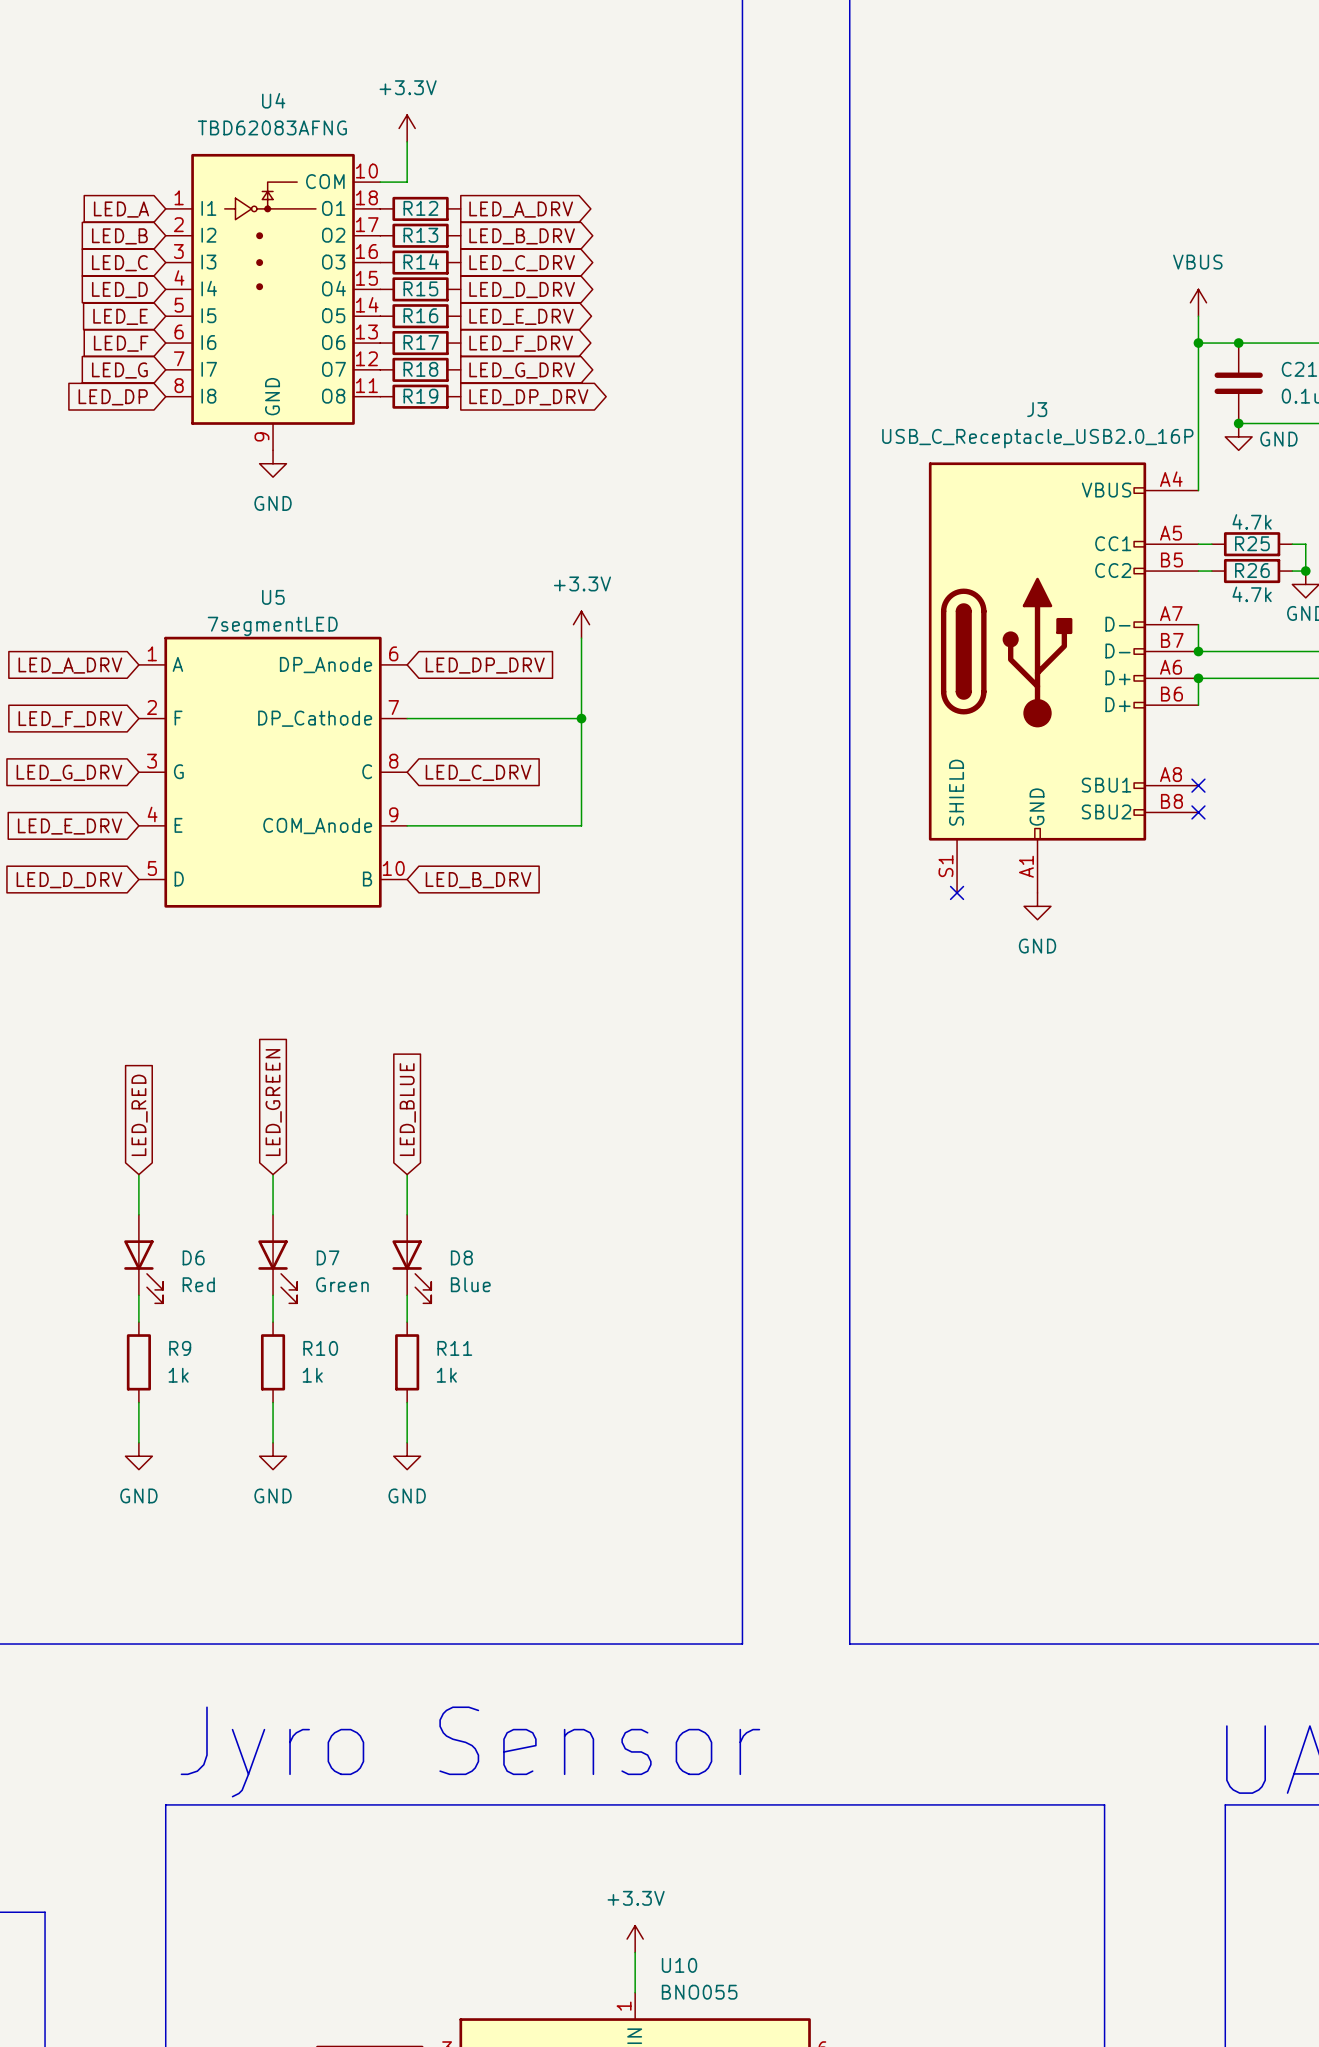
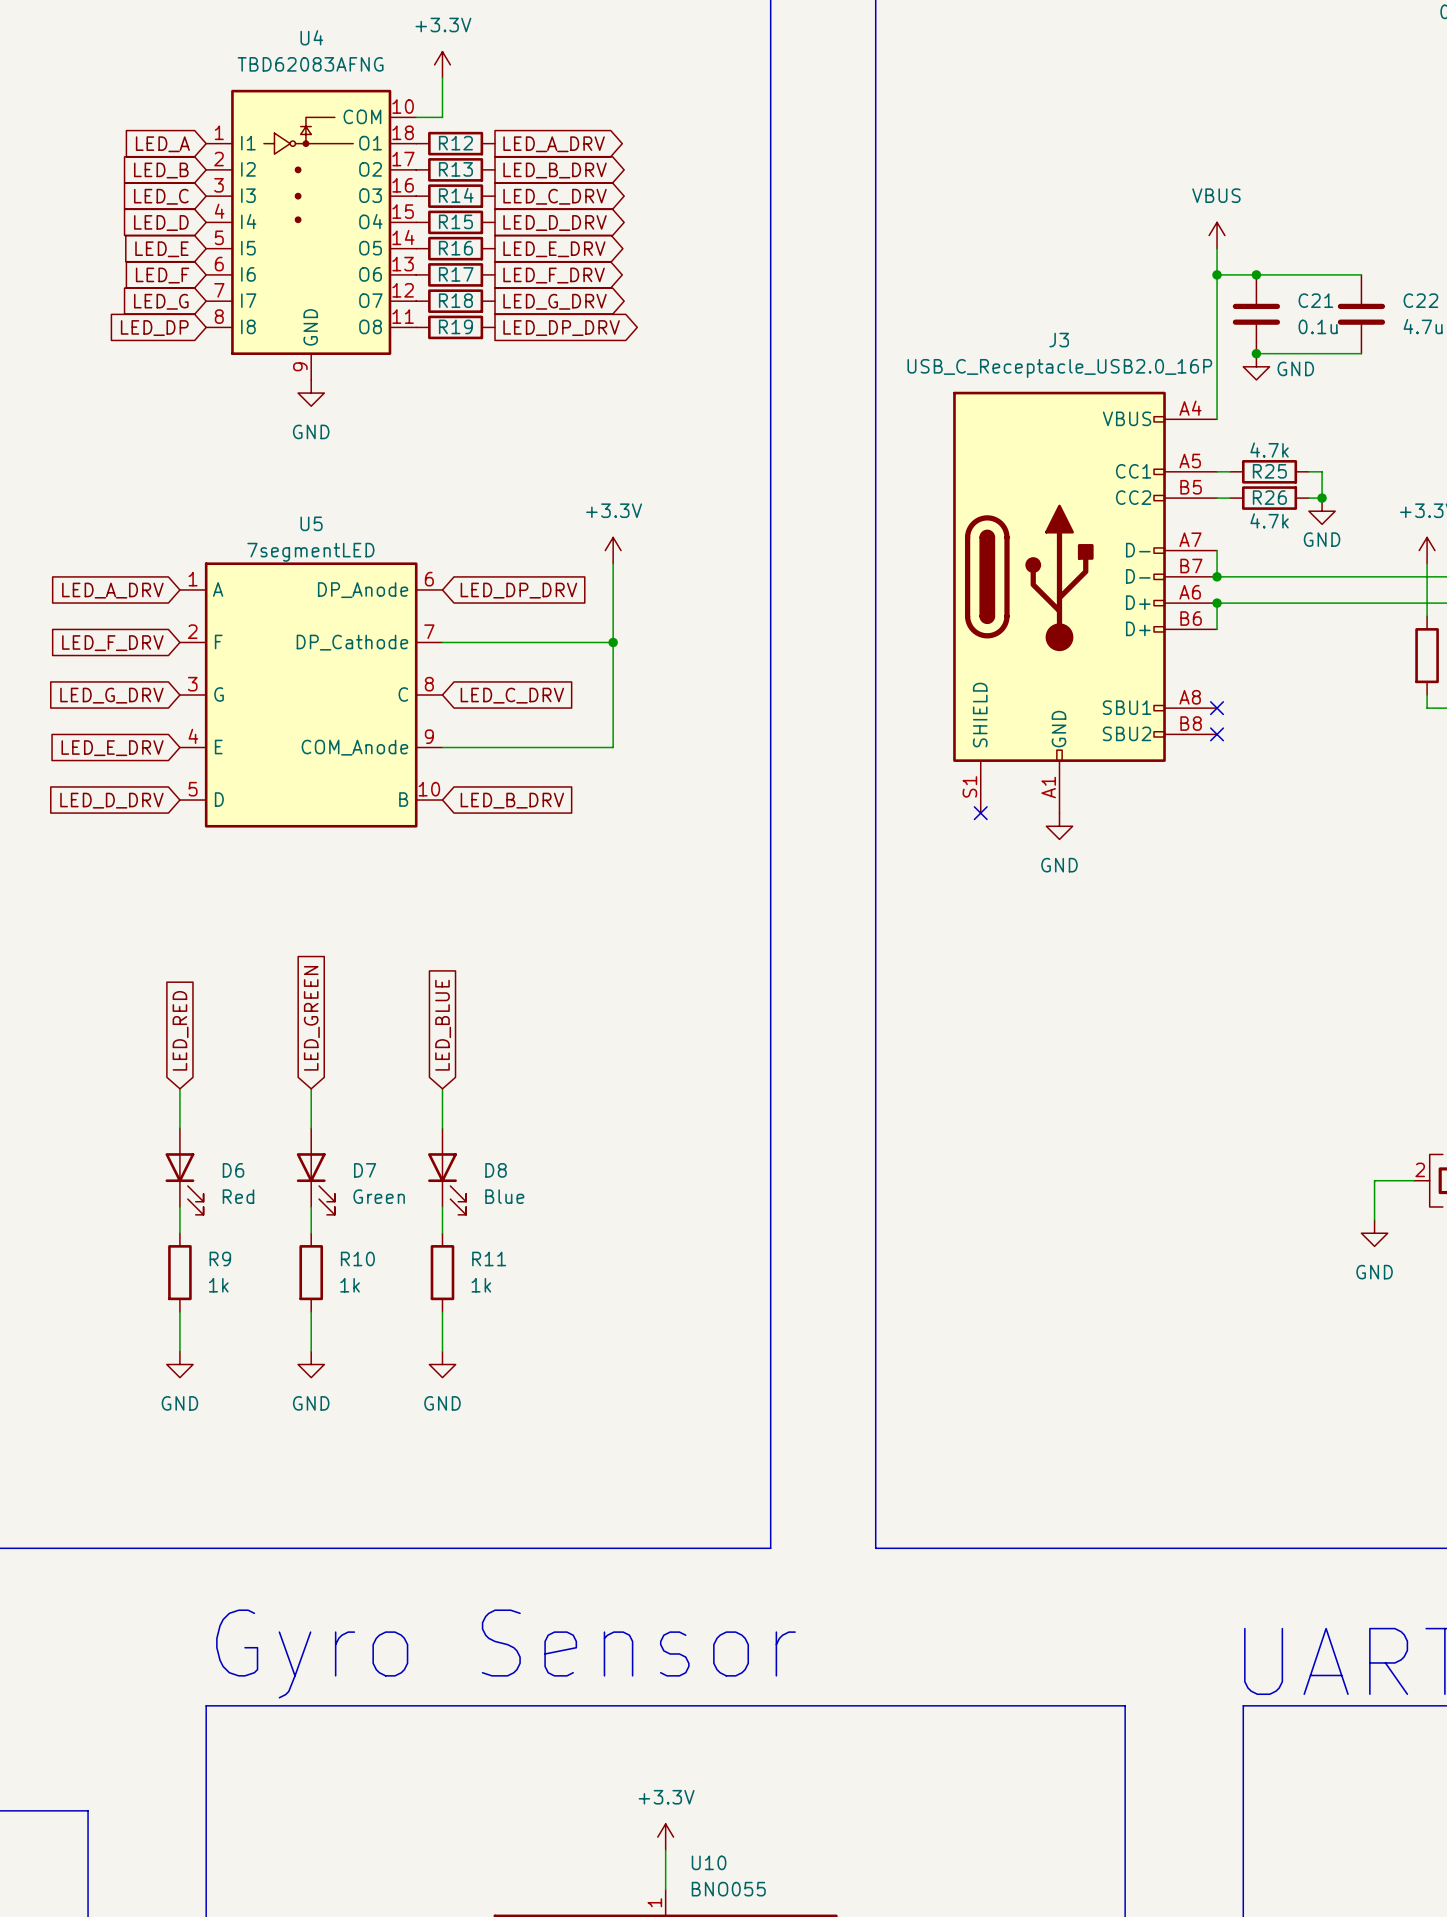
text: Jyro Sensor (470, 1751) -> Gyro Sensor (506, 1653)

